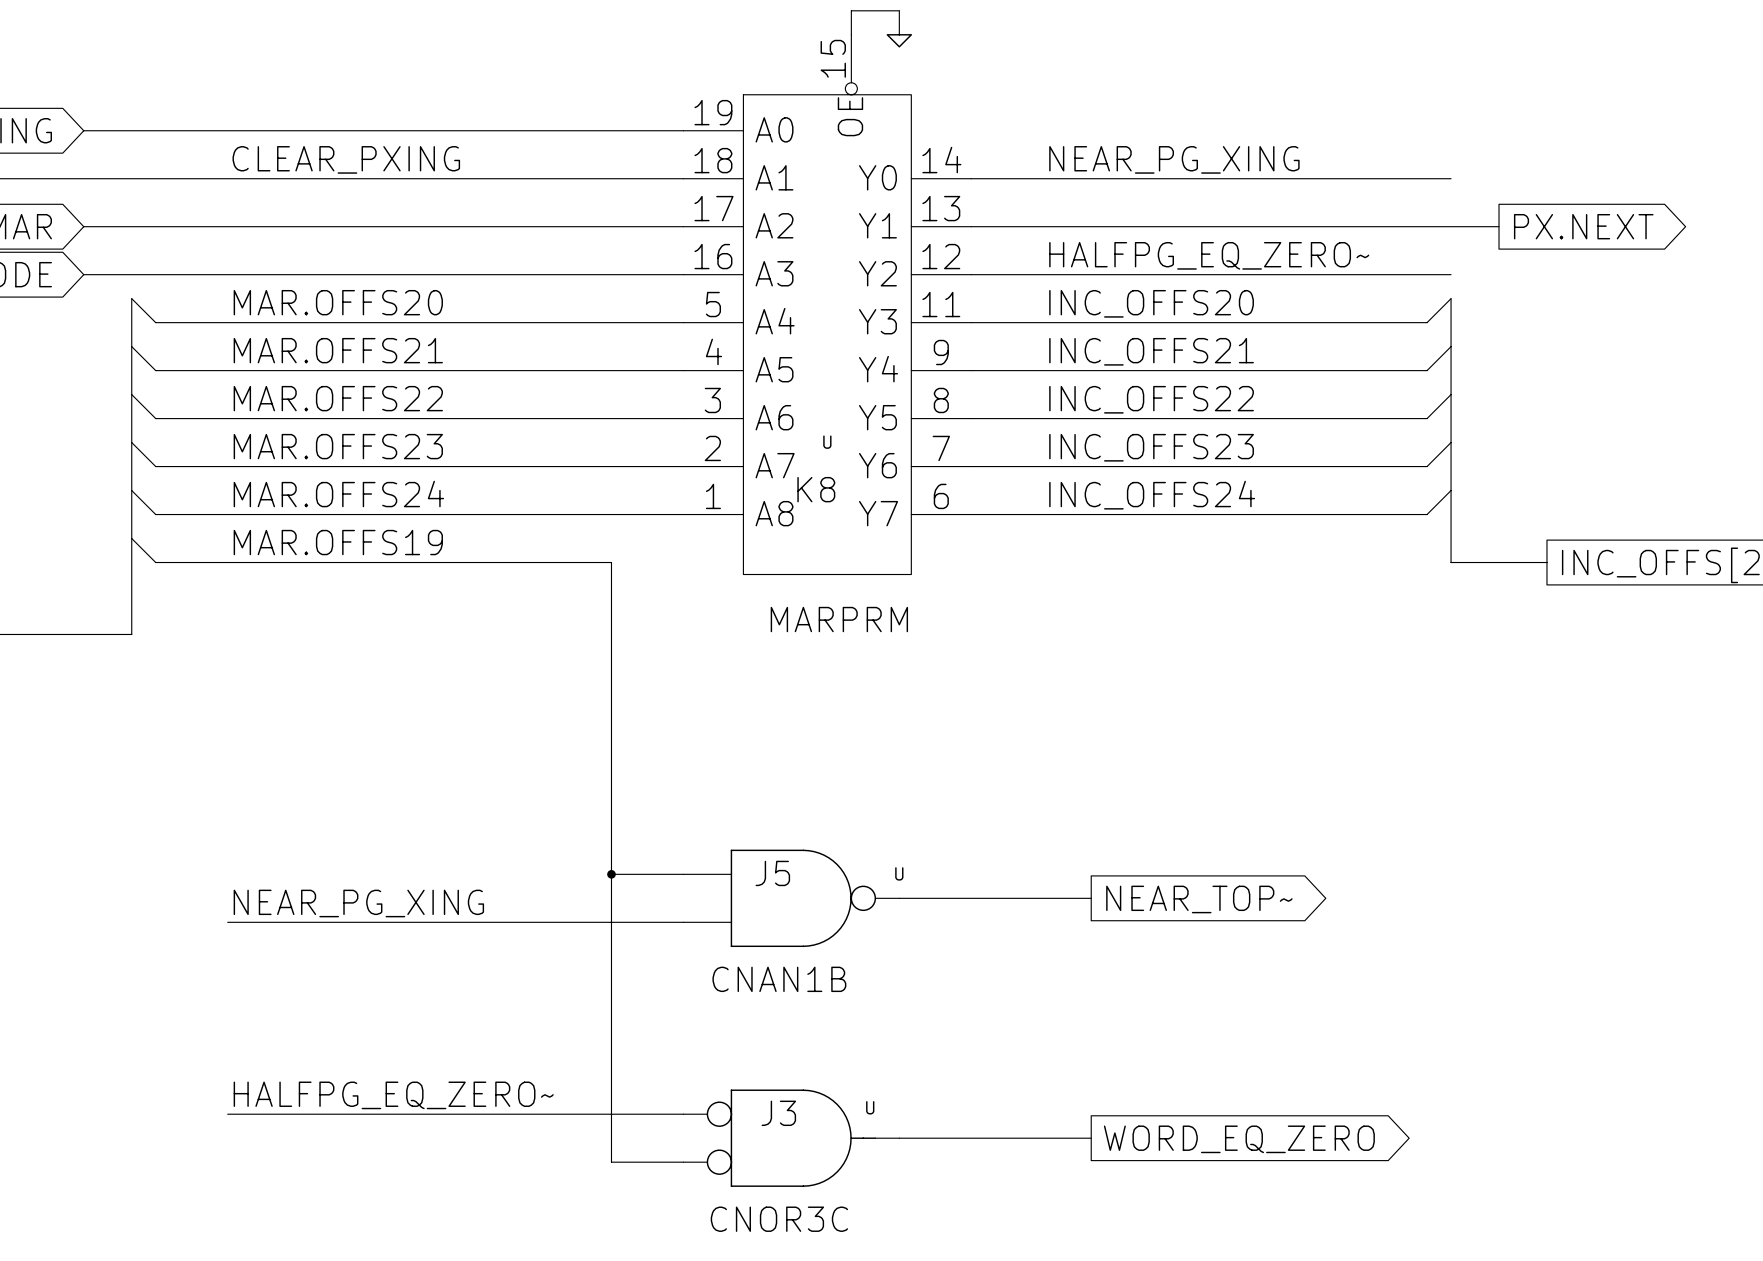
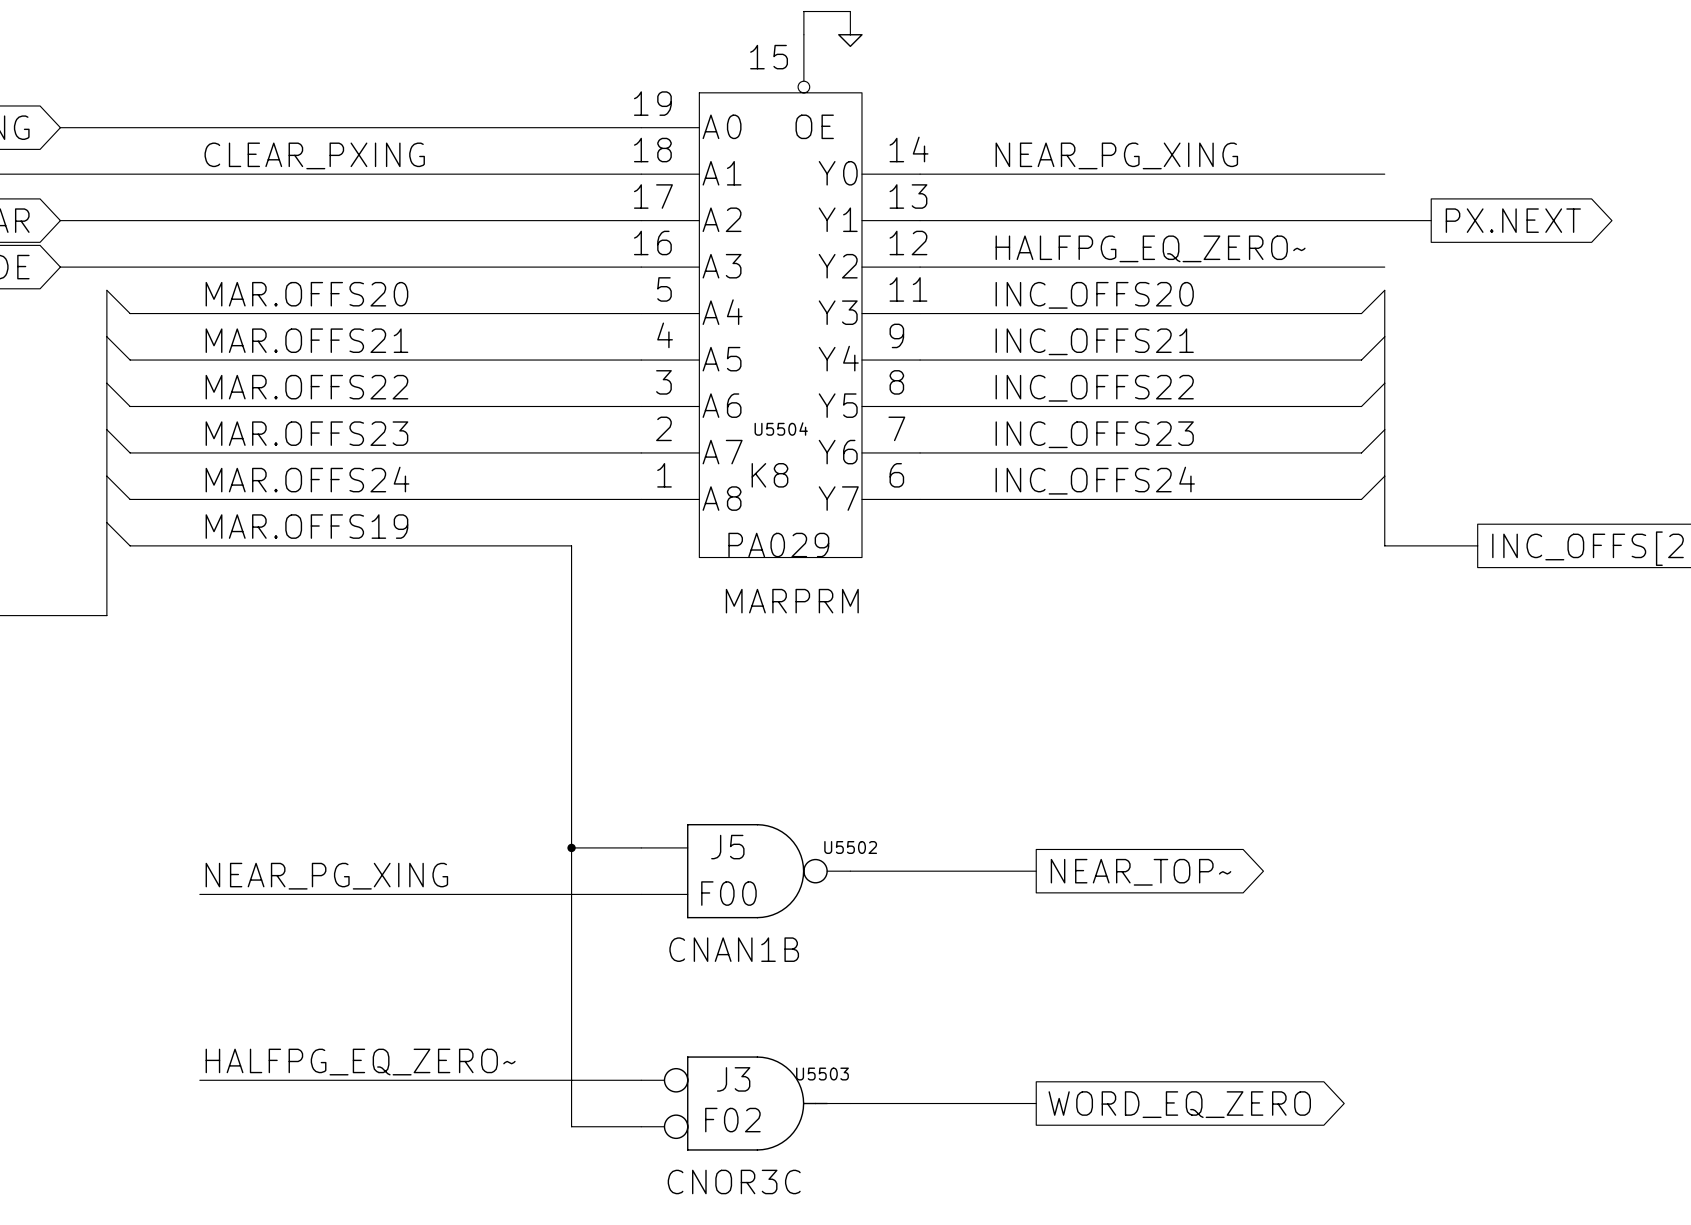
U symbol: [683, 34, 972, 575] -> [641, 34, 921, 558]
U name: U (827, 442) -> U5504 (781, 429)
U value: none -> PA029 (778, 545)
U name: U (899, 873) -> U5502 (850, 847)
U value: none -> F00 (728, 893)
U name: U (870, 1107) -> U5503 (822, 1074)
U value: none -> F02 (732, 1120)

